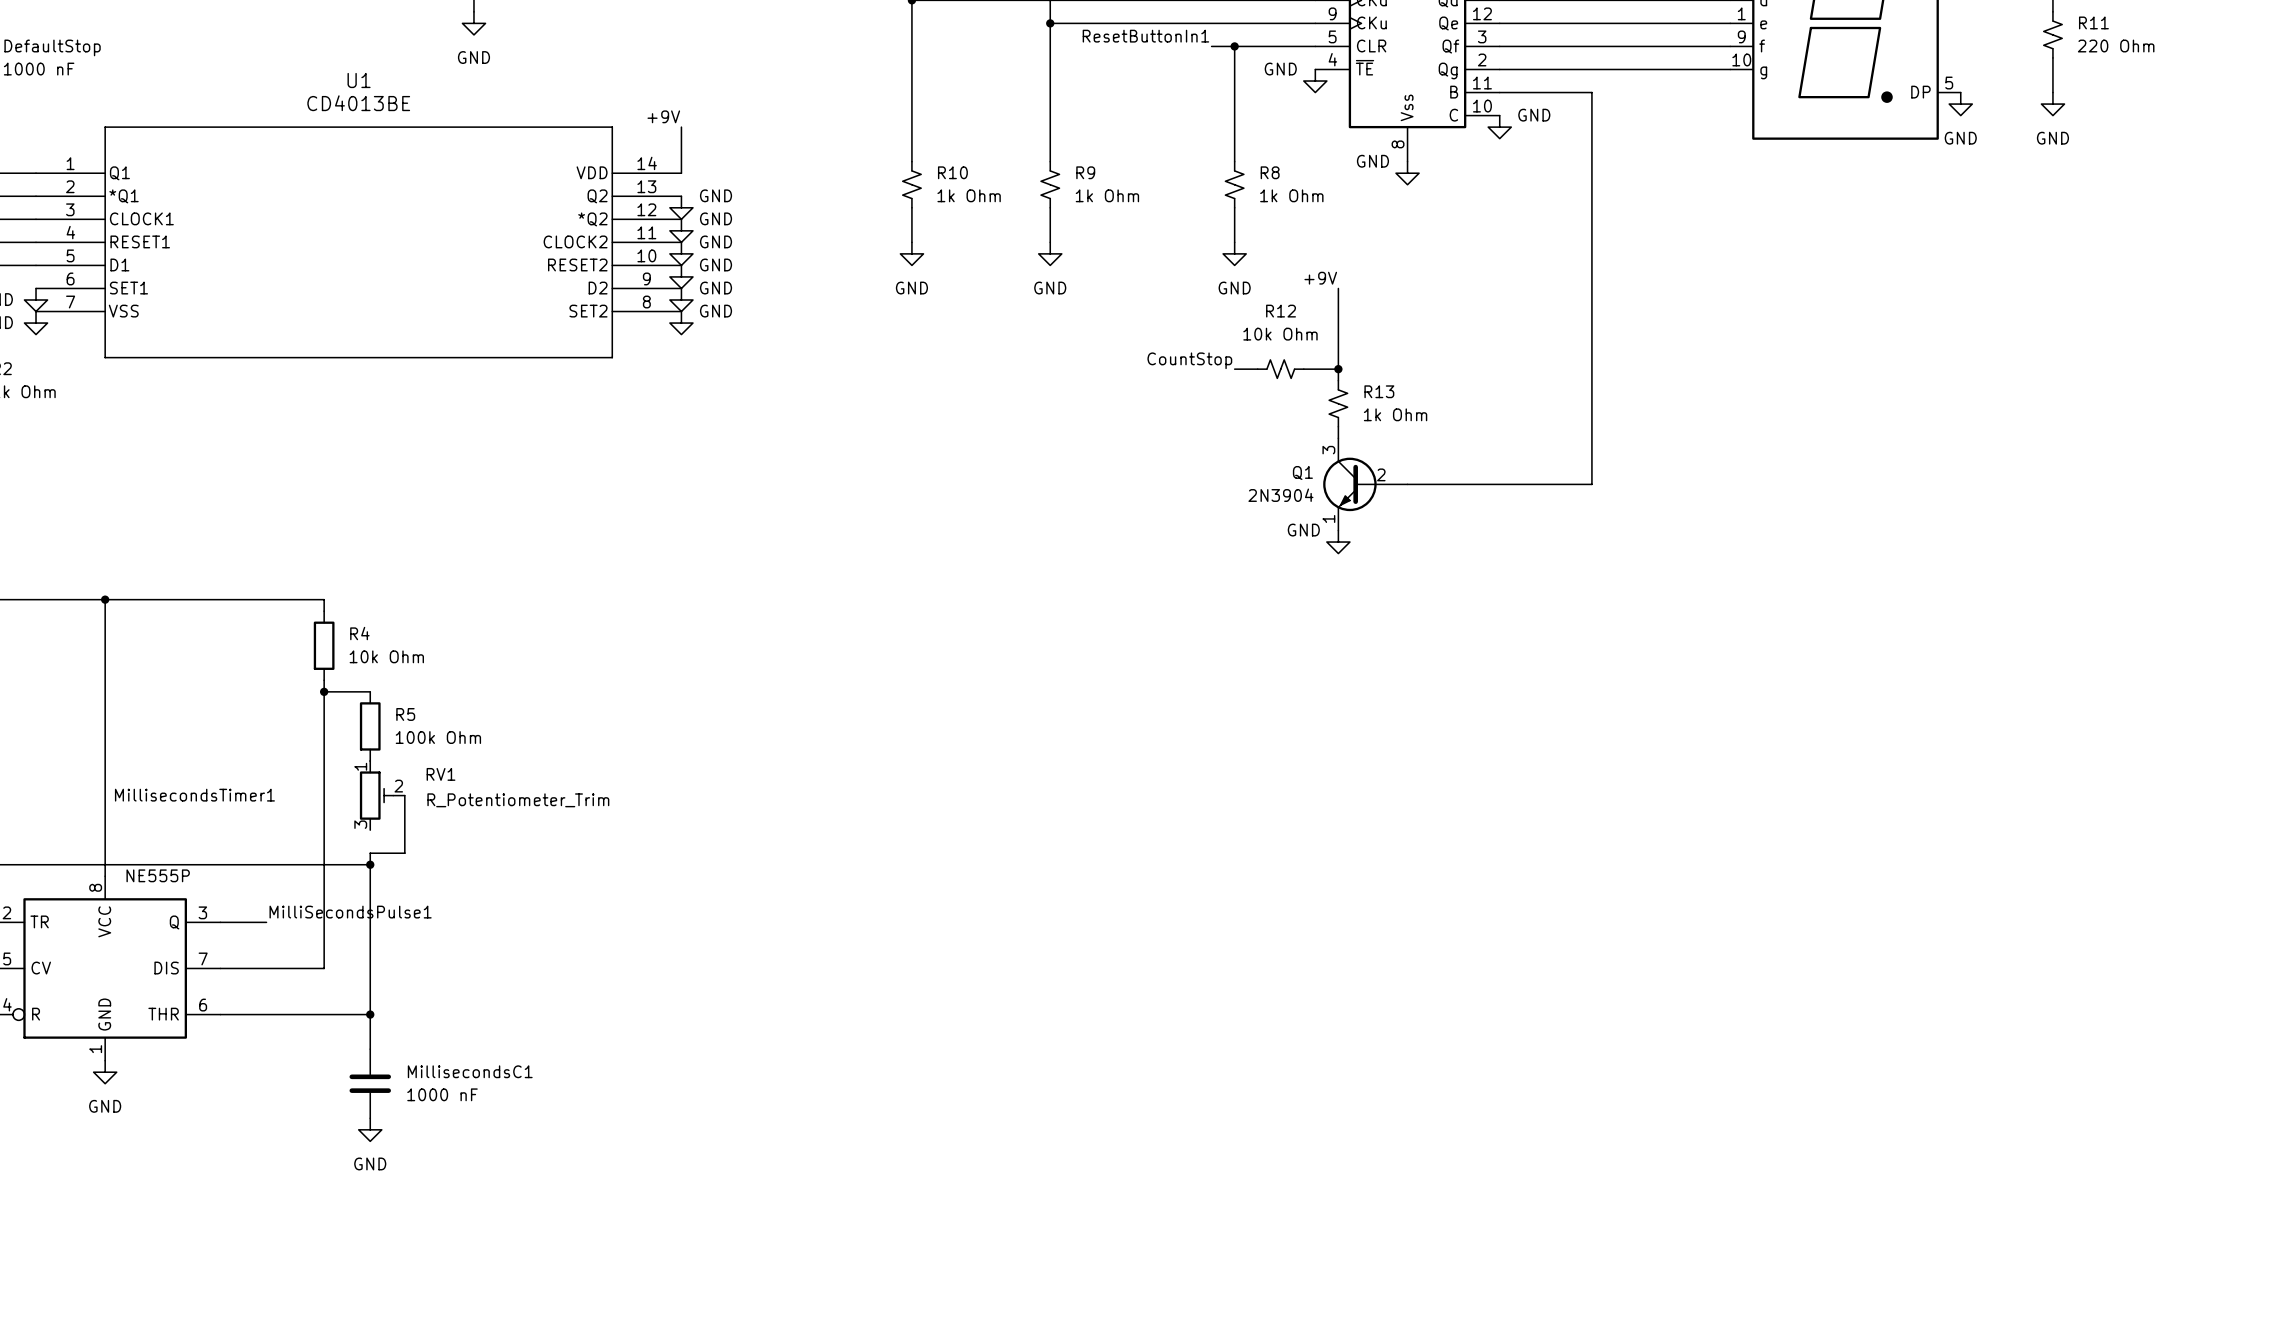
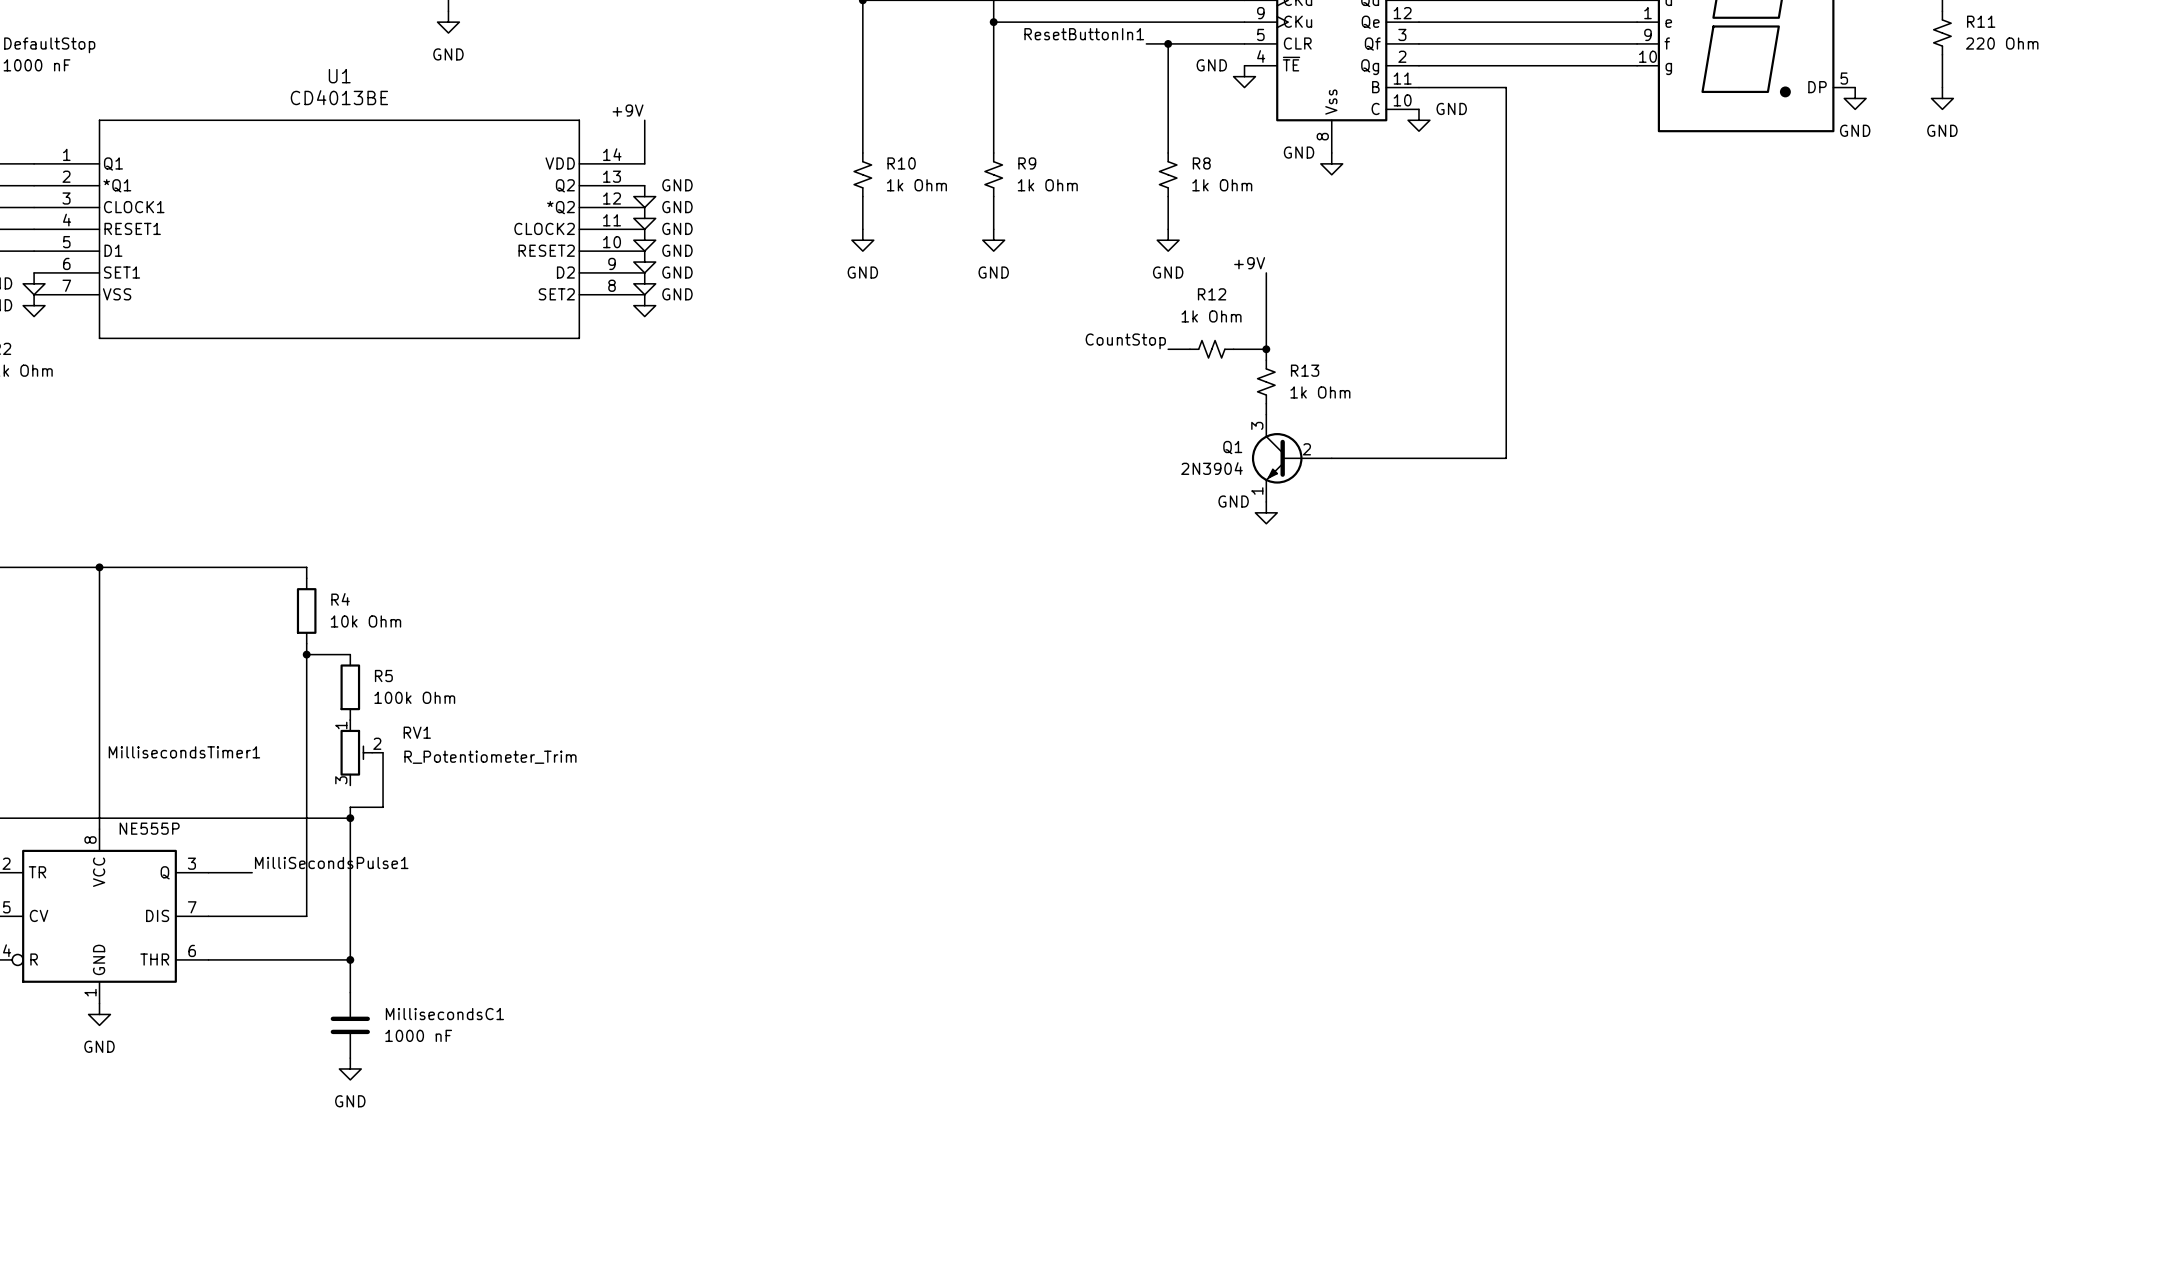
R12 value: 10k Ohm (1280, 334) -> 1k Ohm (1211, 316)

